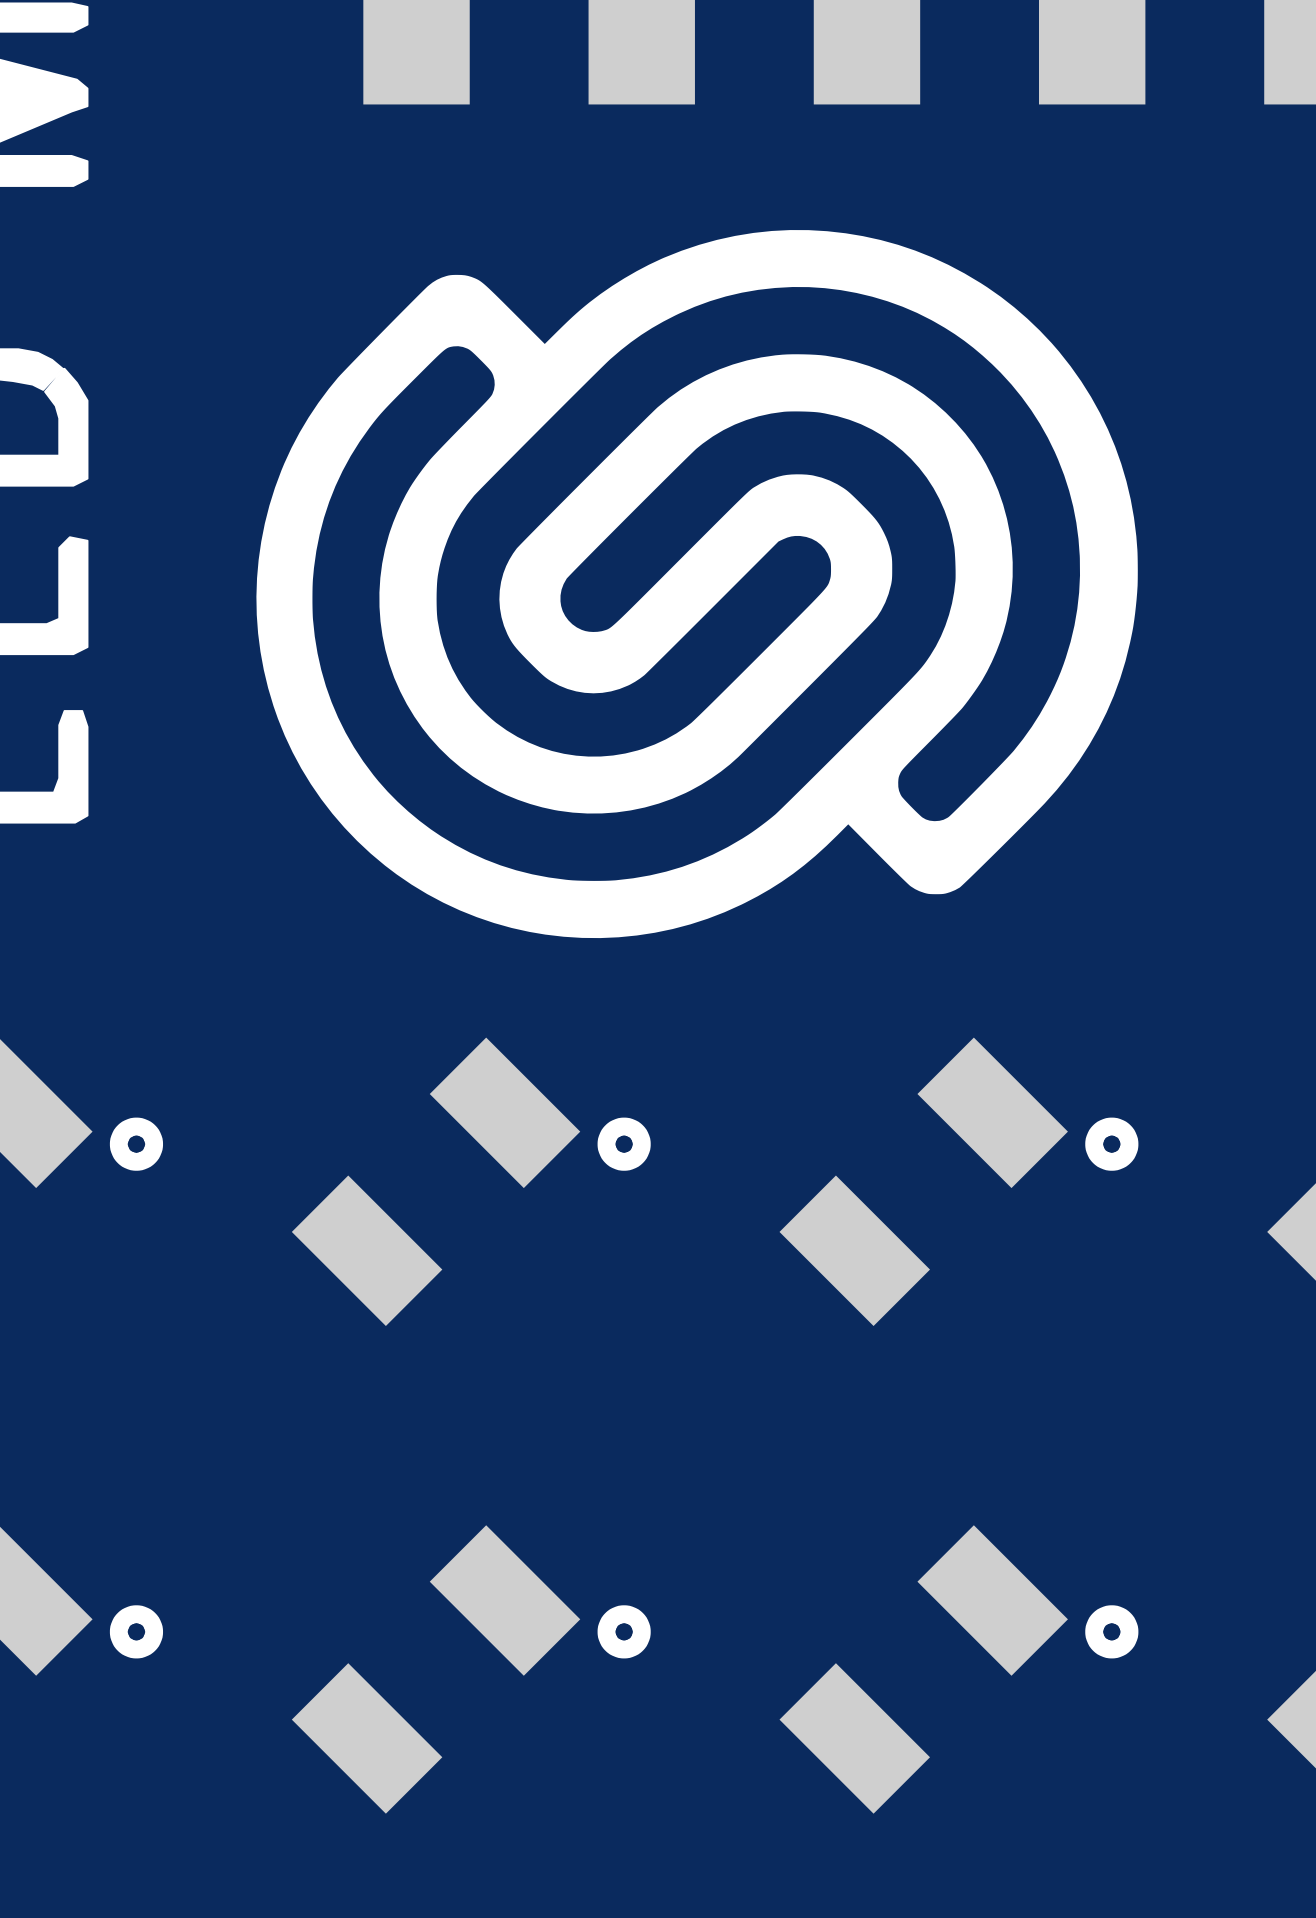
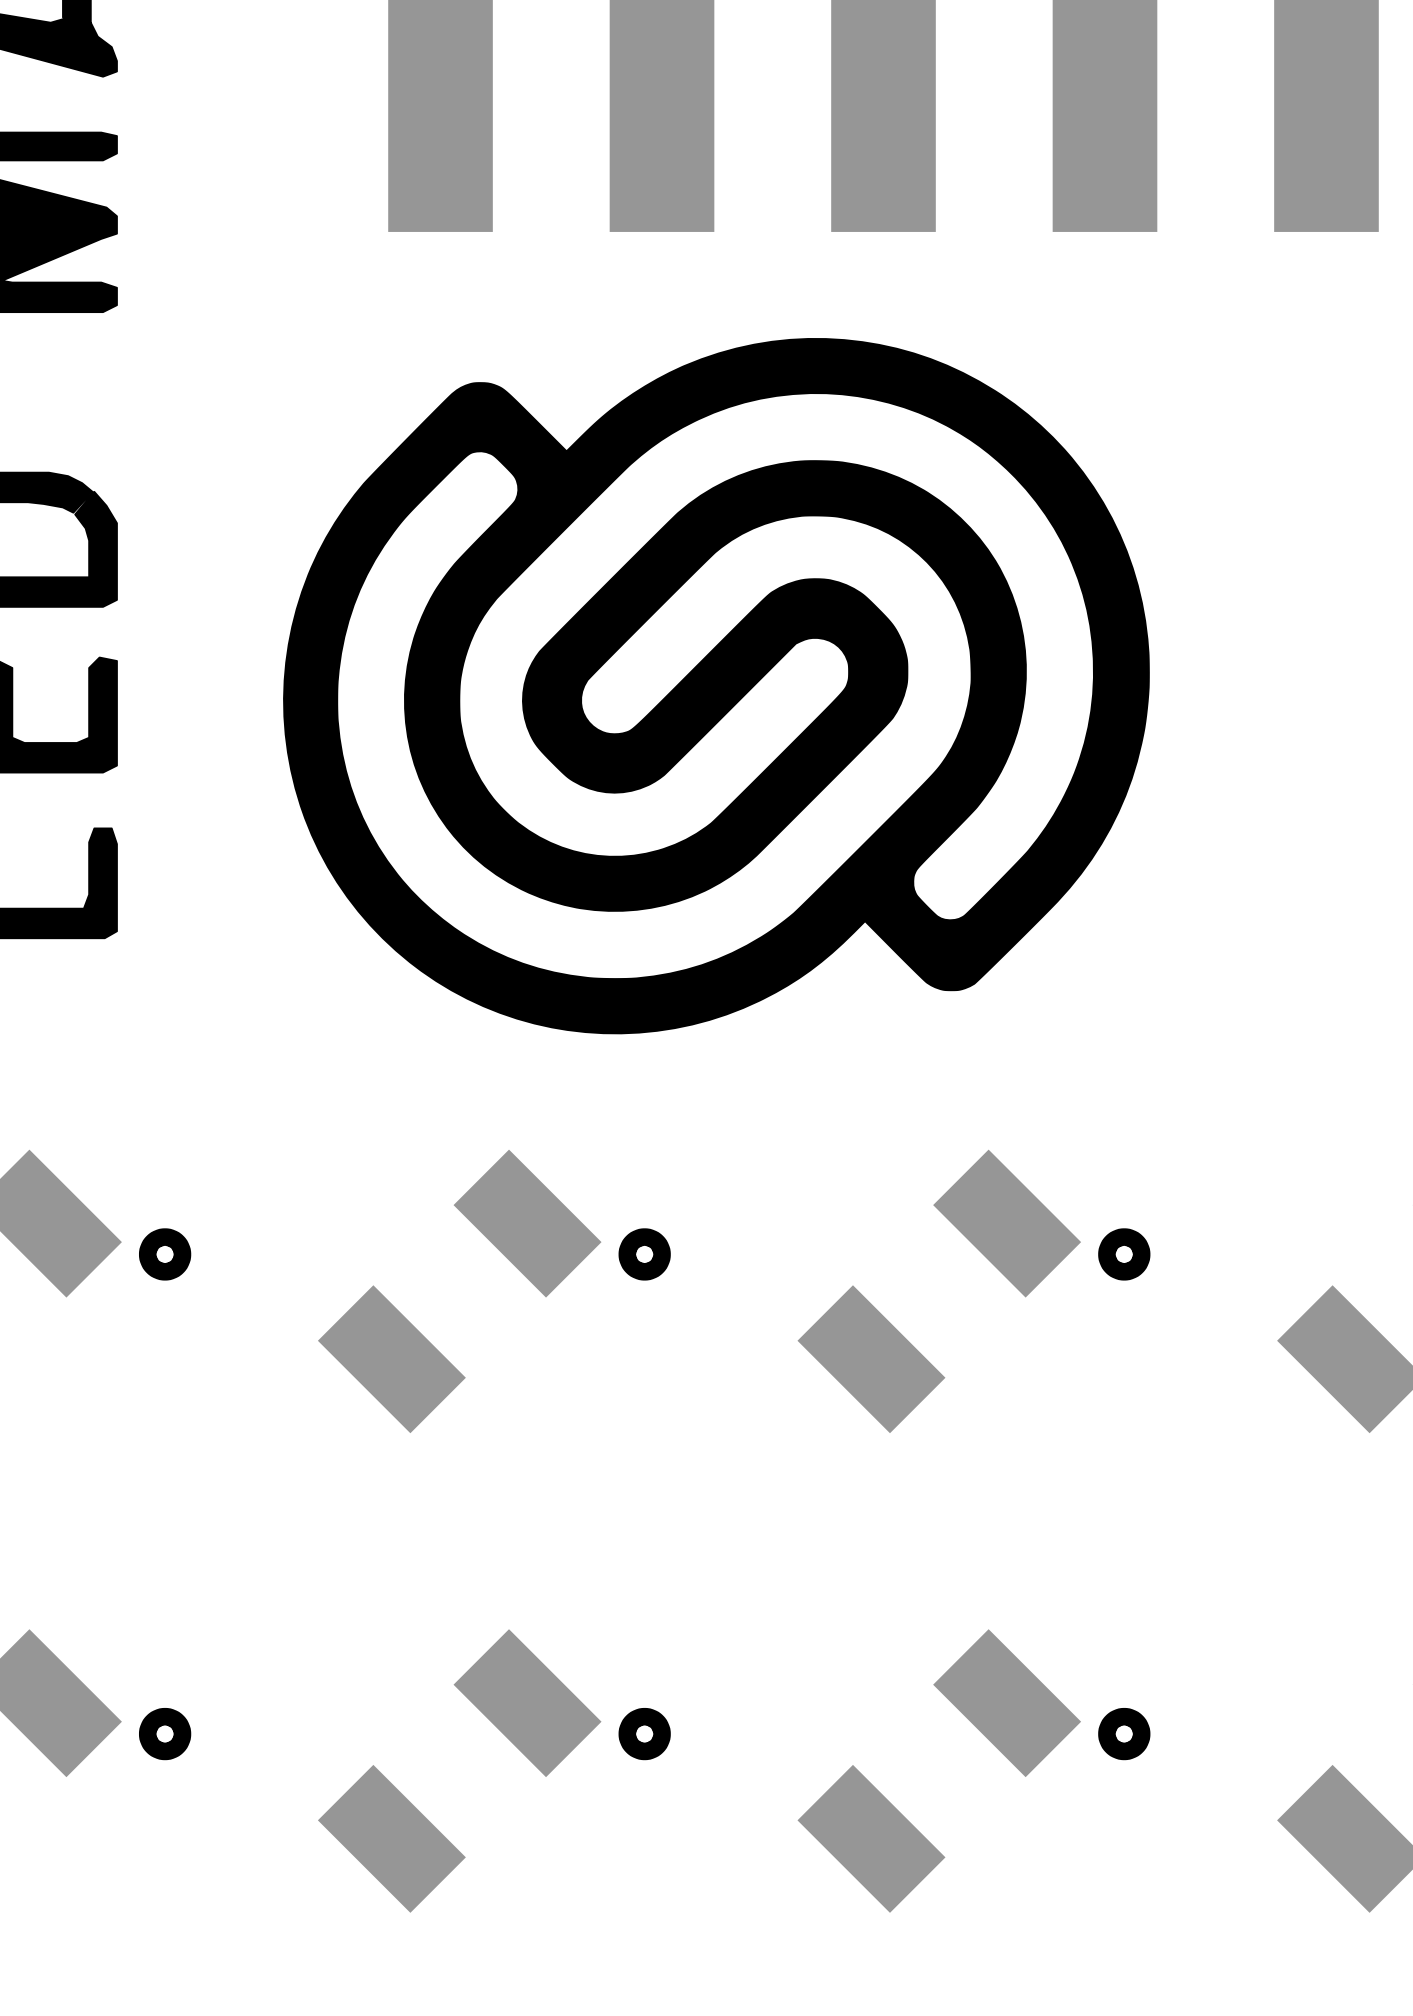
drawing position: (697, 584) -> (716, 686)

